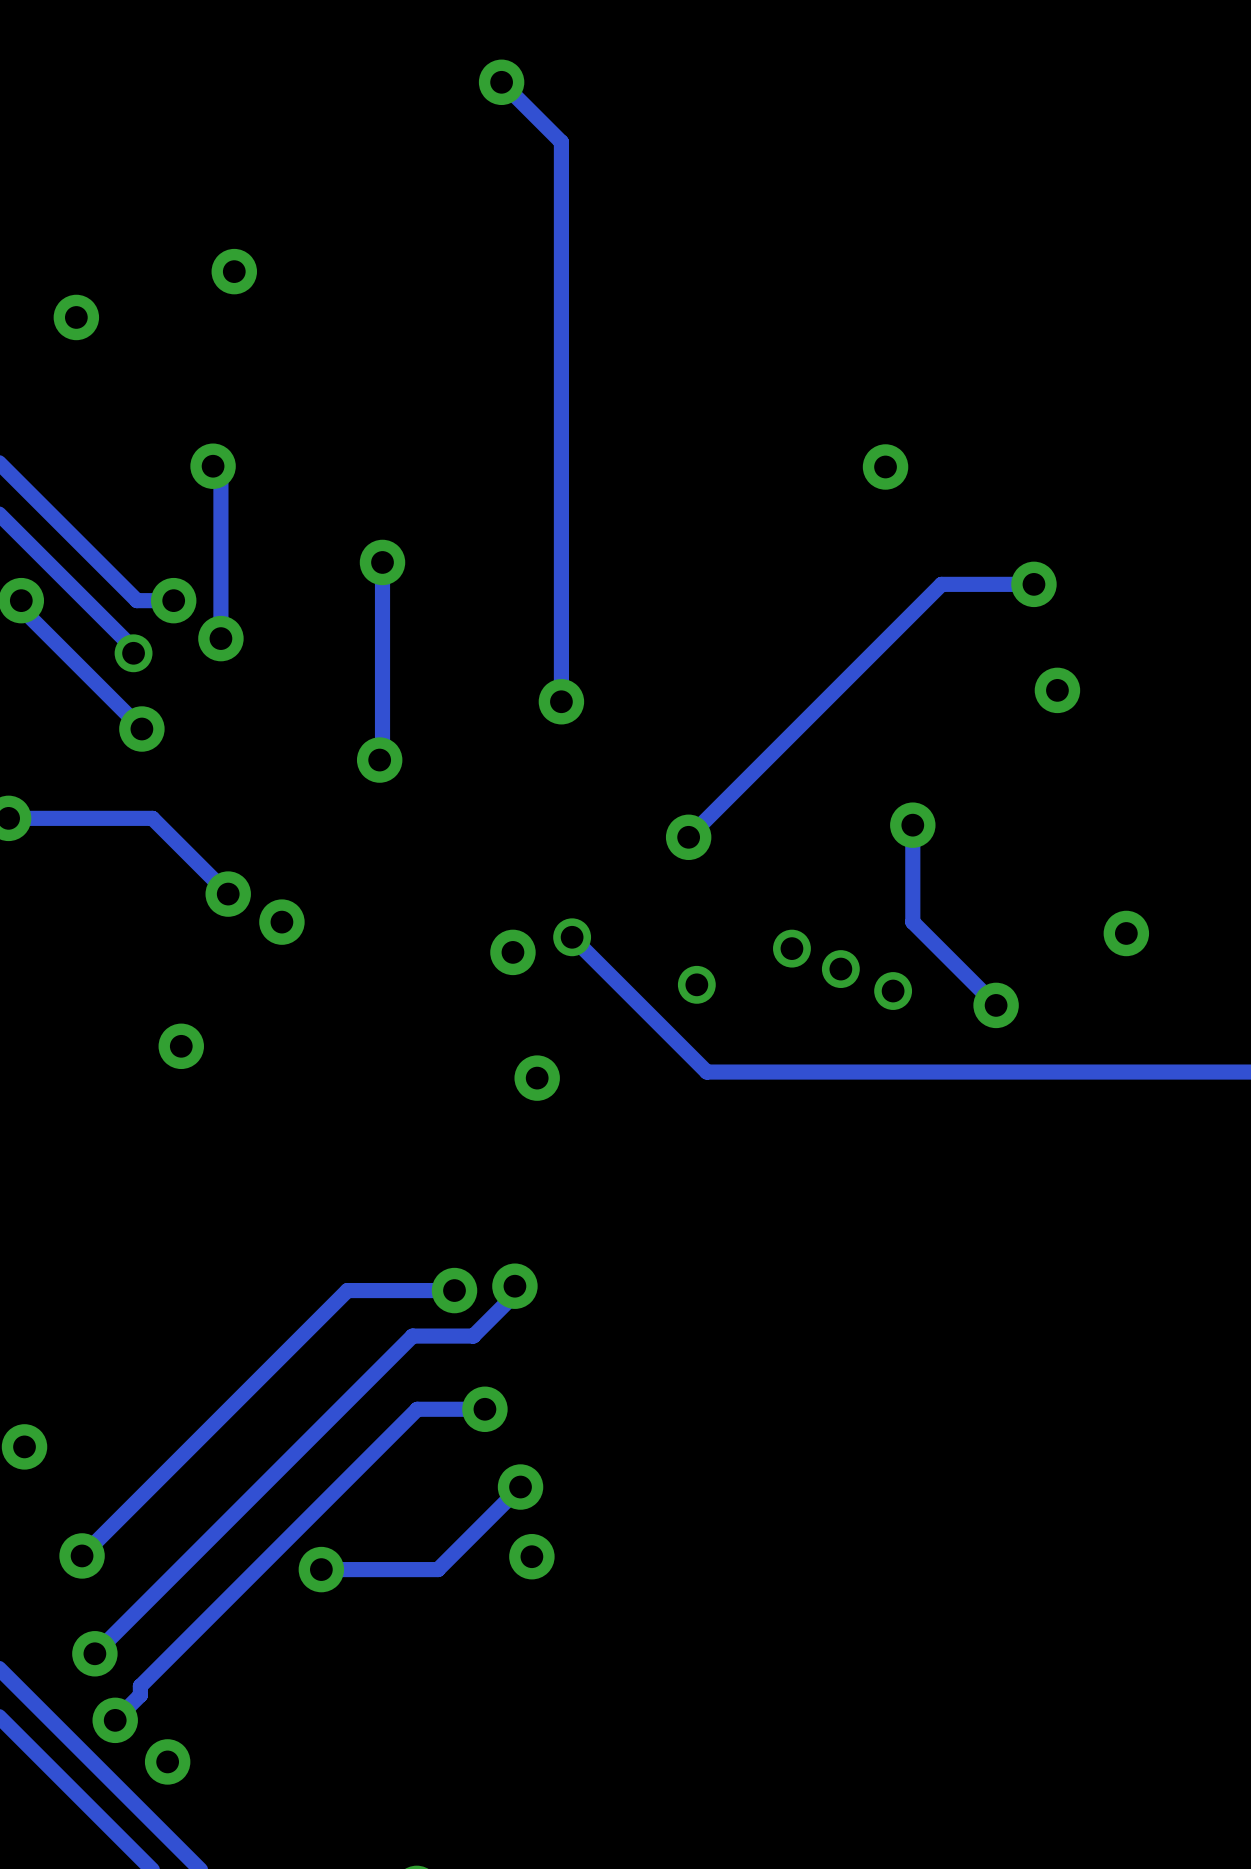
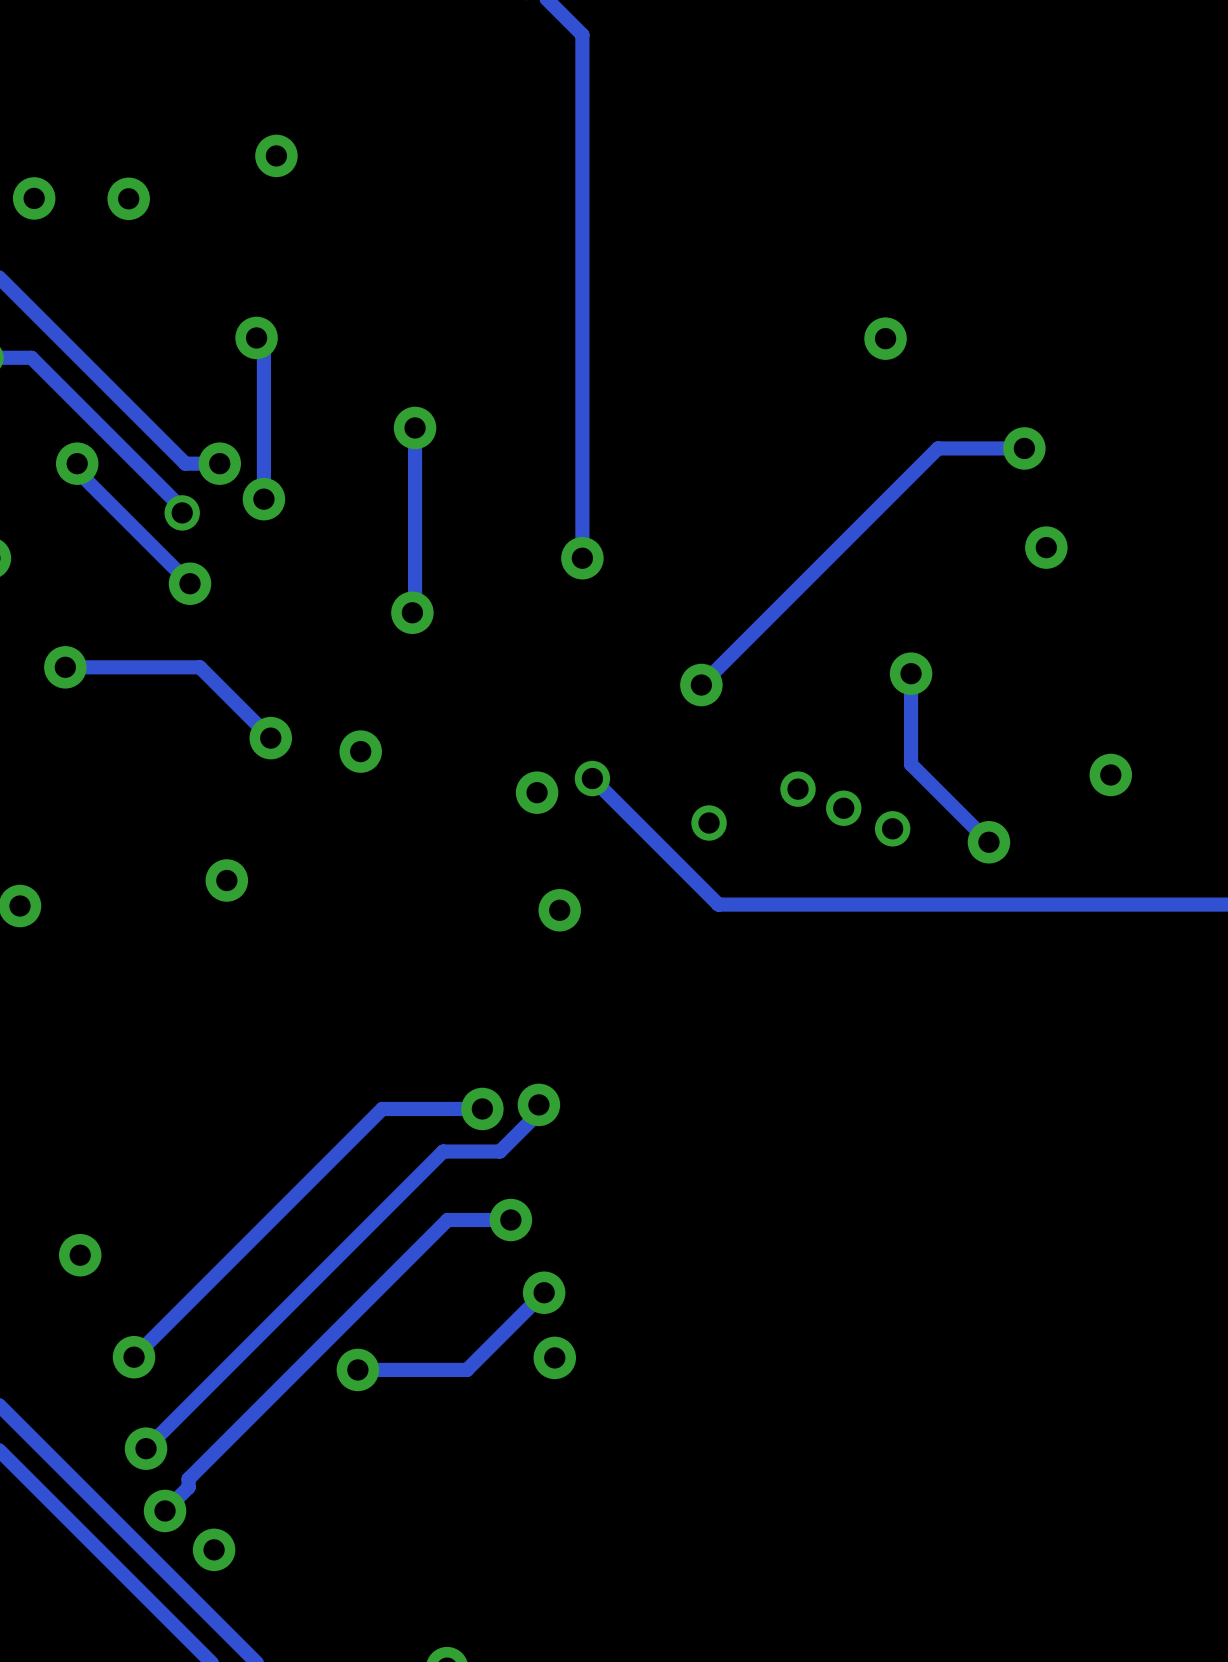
via position: (281, 922) -> (360, 751)

